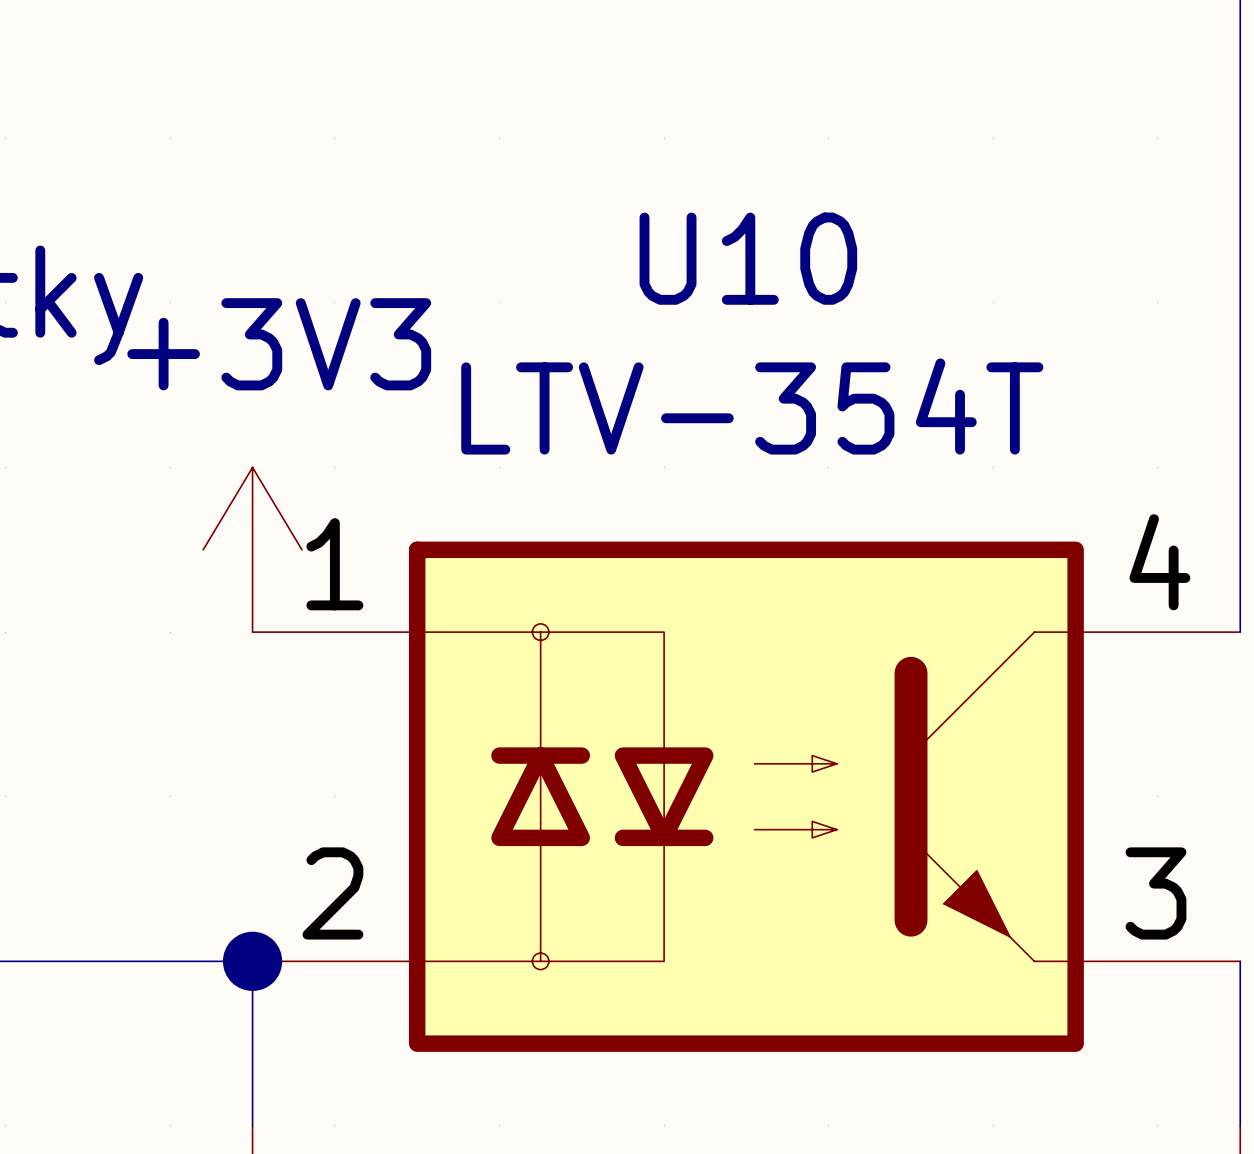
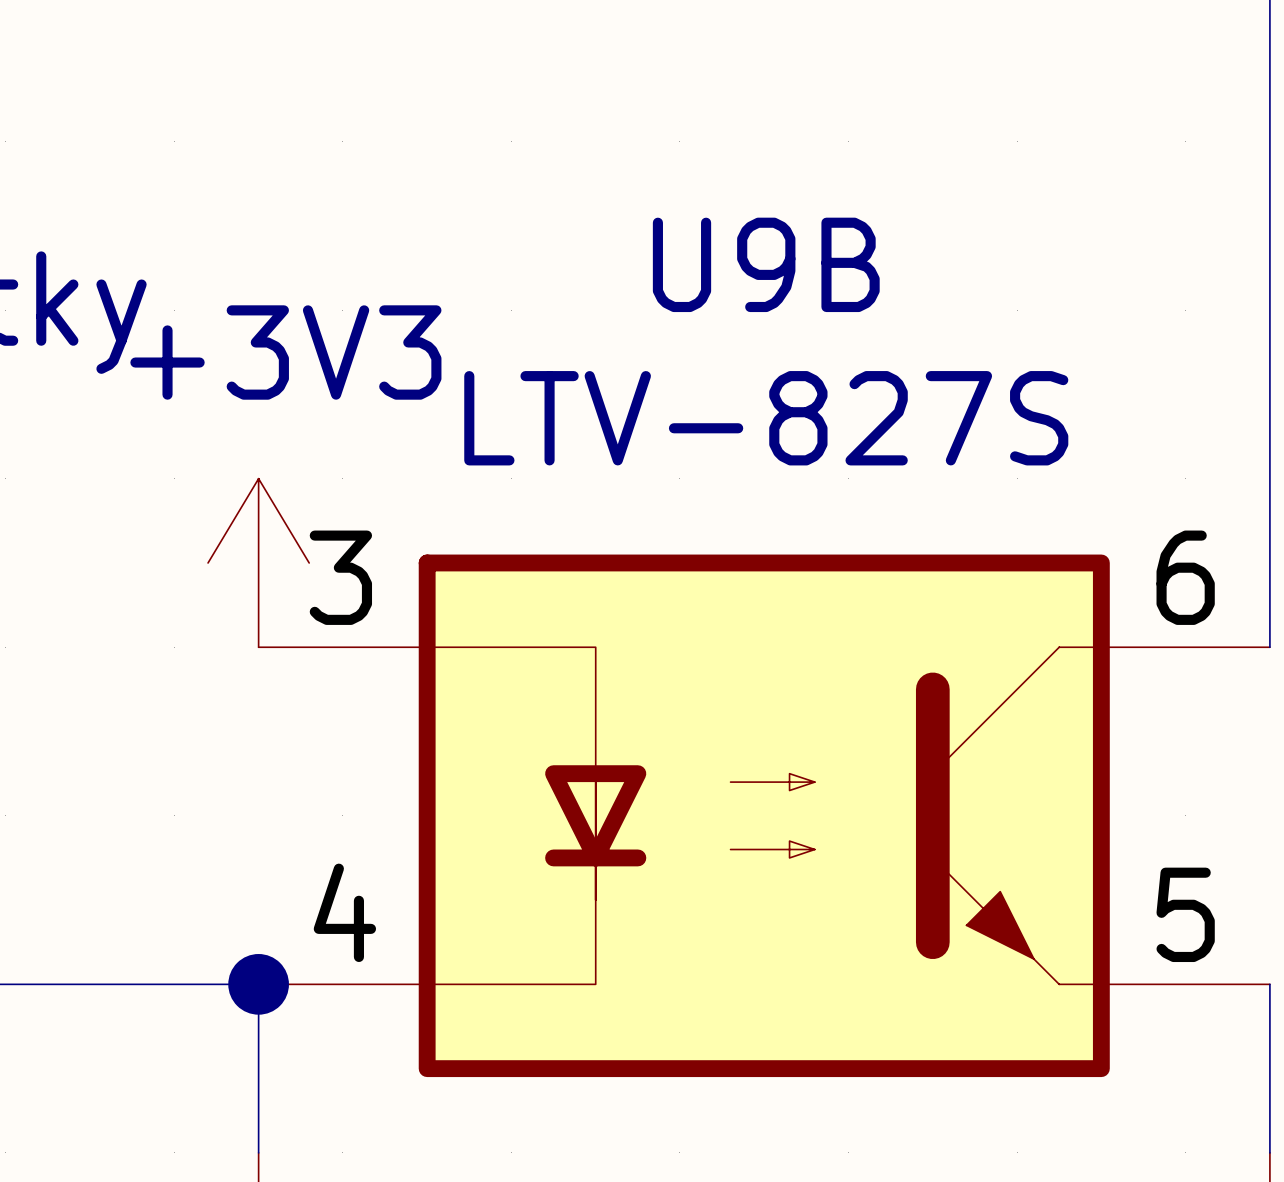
U10: LTV-354T (746, 796) -> none
U9B: none -> LTV-827S (764, 815)

